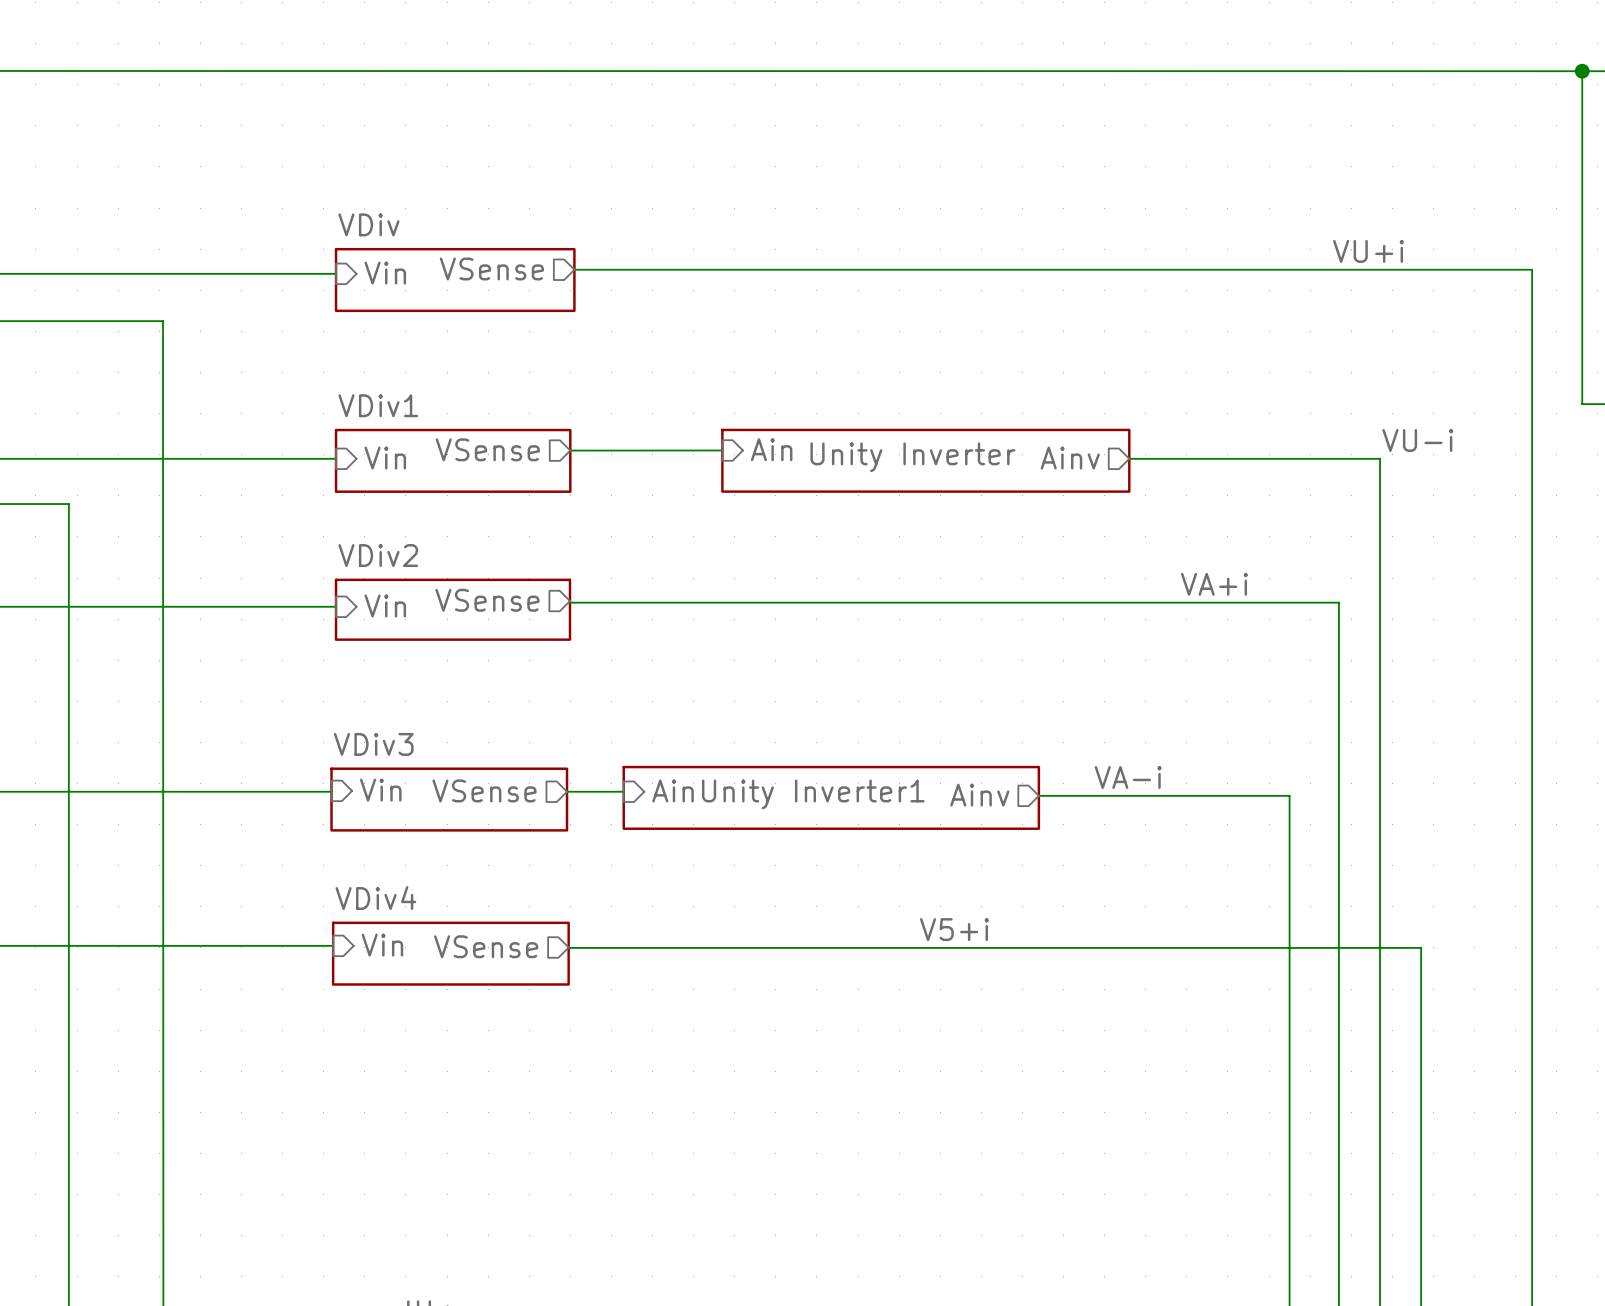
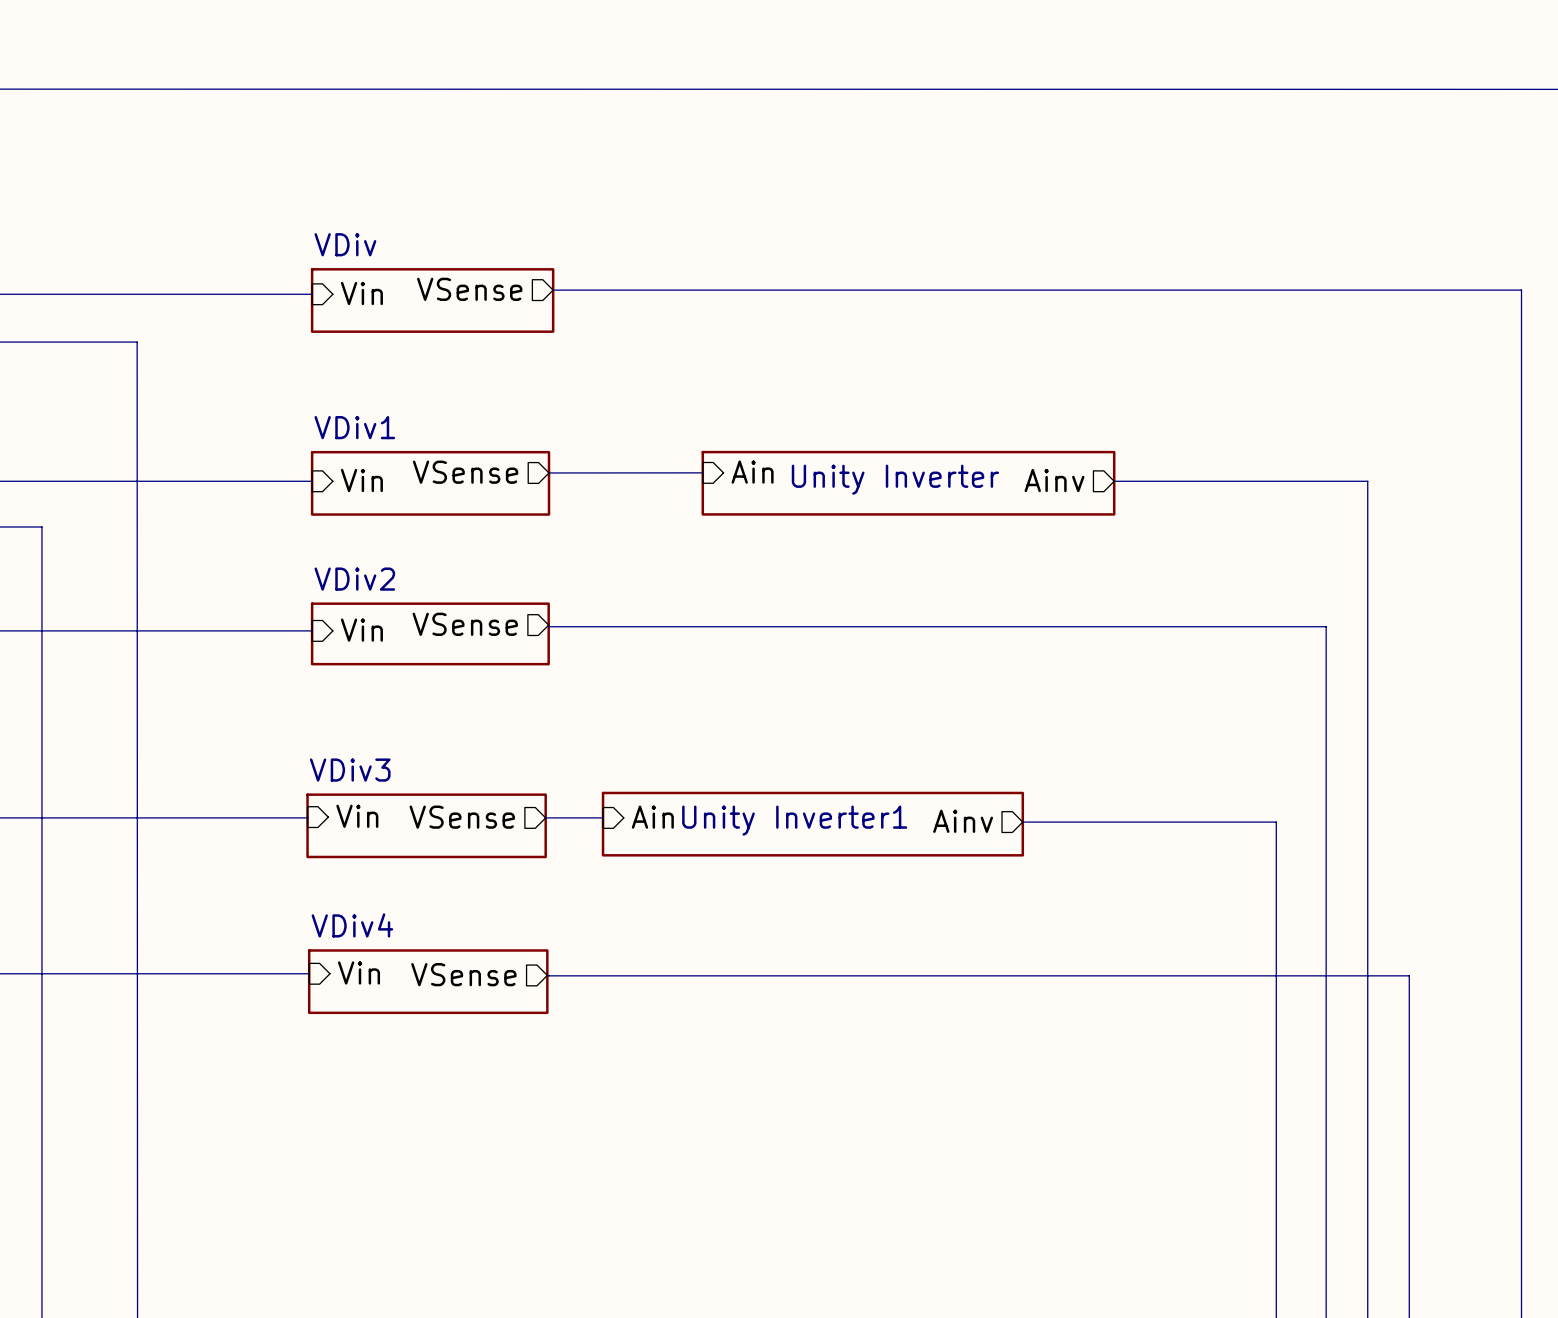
label: VU+i (1368, 251) -> none
label: VU-i (1417, 440) -> none
label: VA+i (1214, 584) -> none
label: VA-i (1128, 777) -> none
label: V5+i (954, 929) -> none

